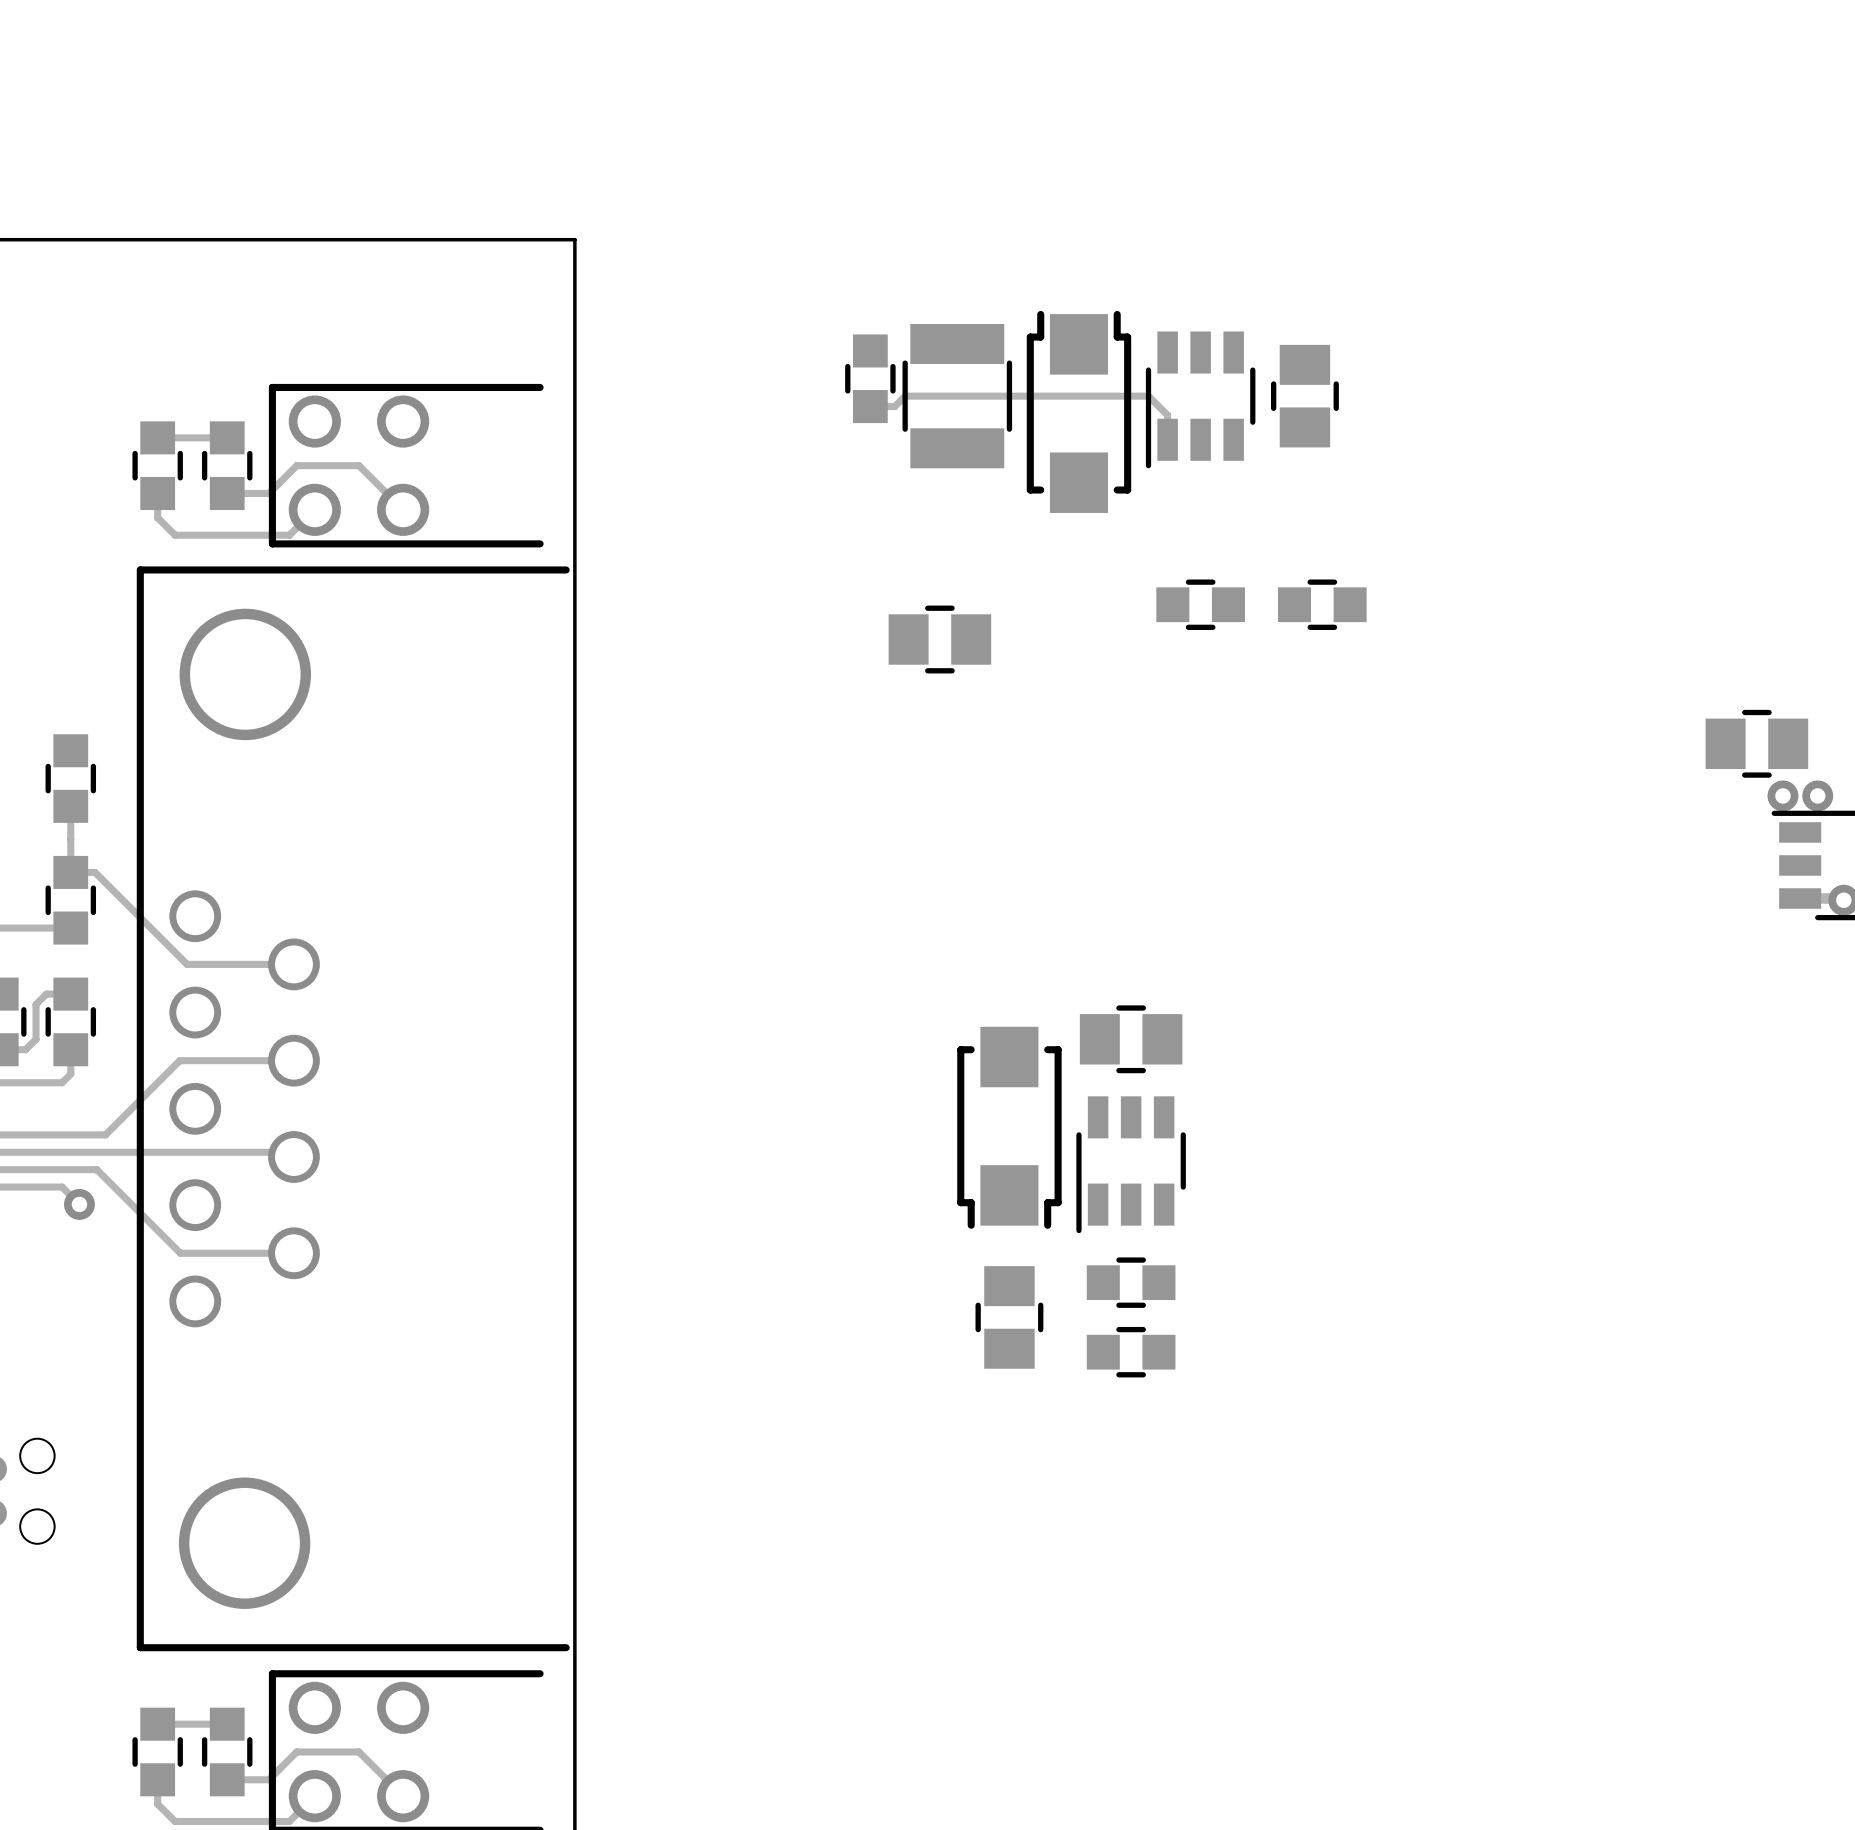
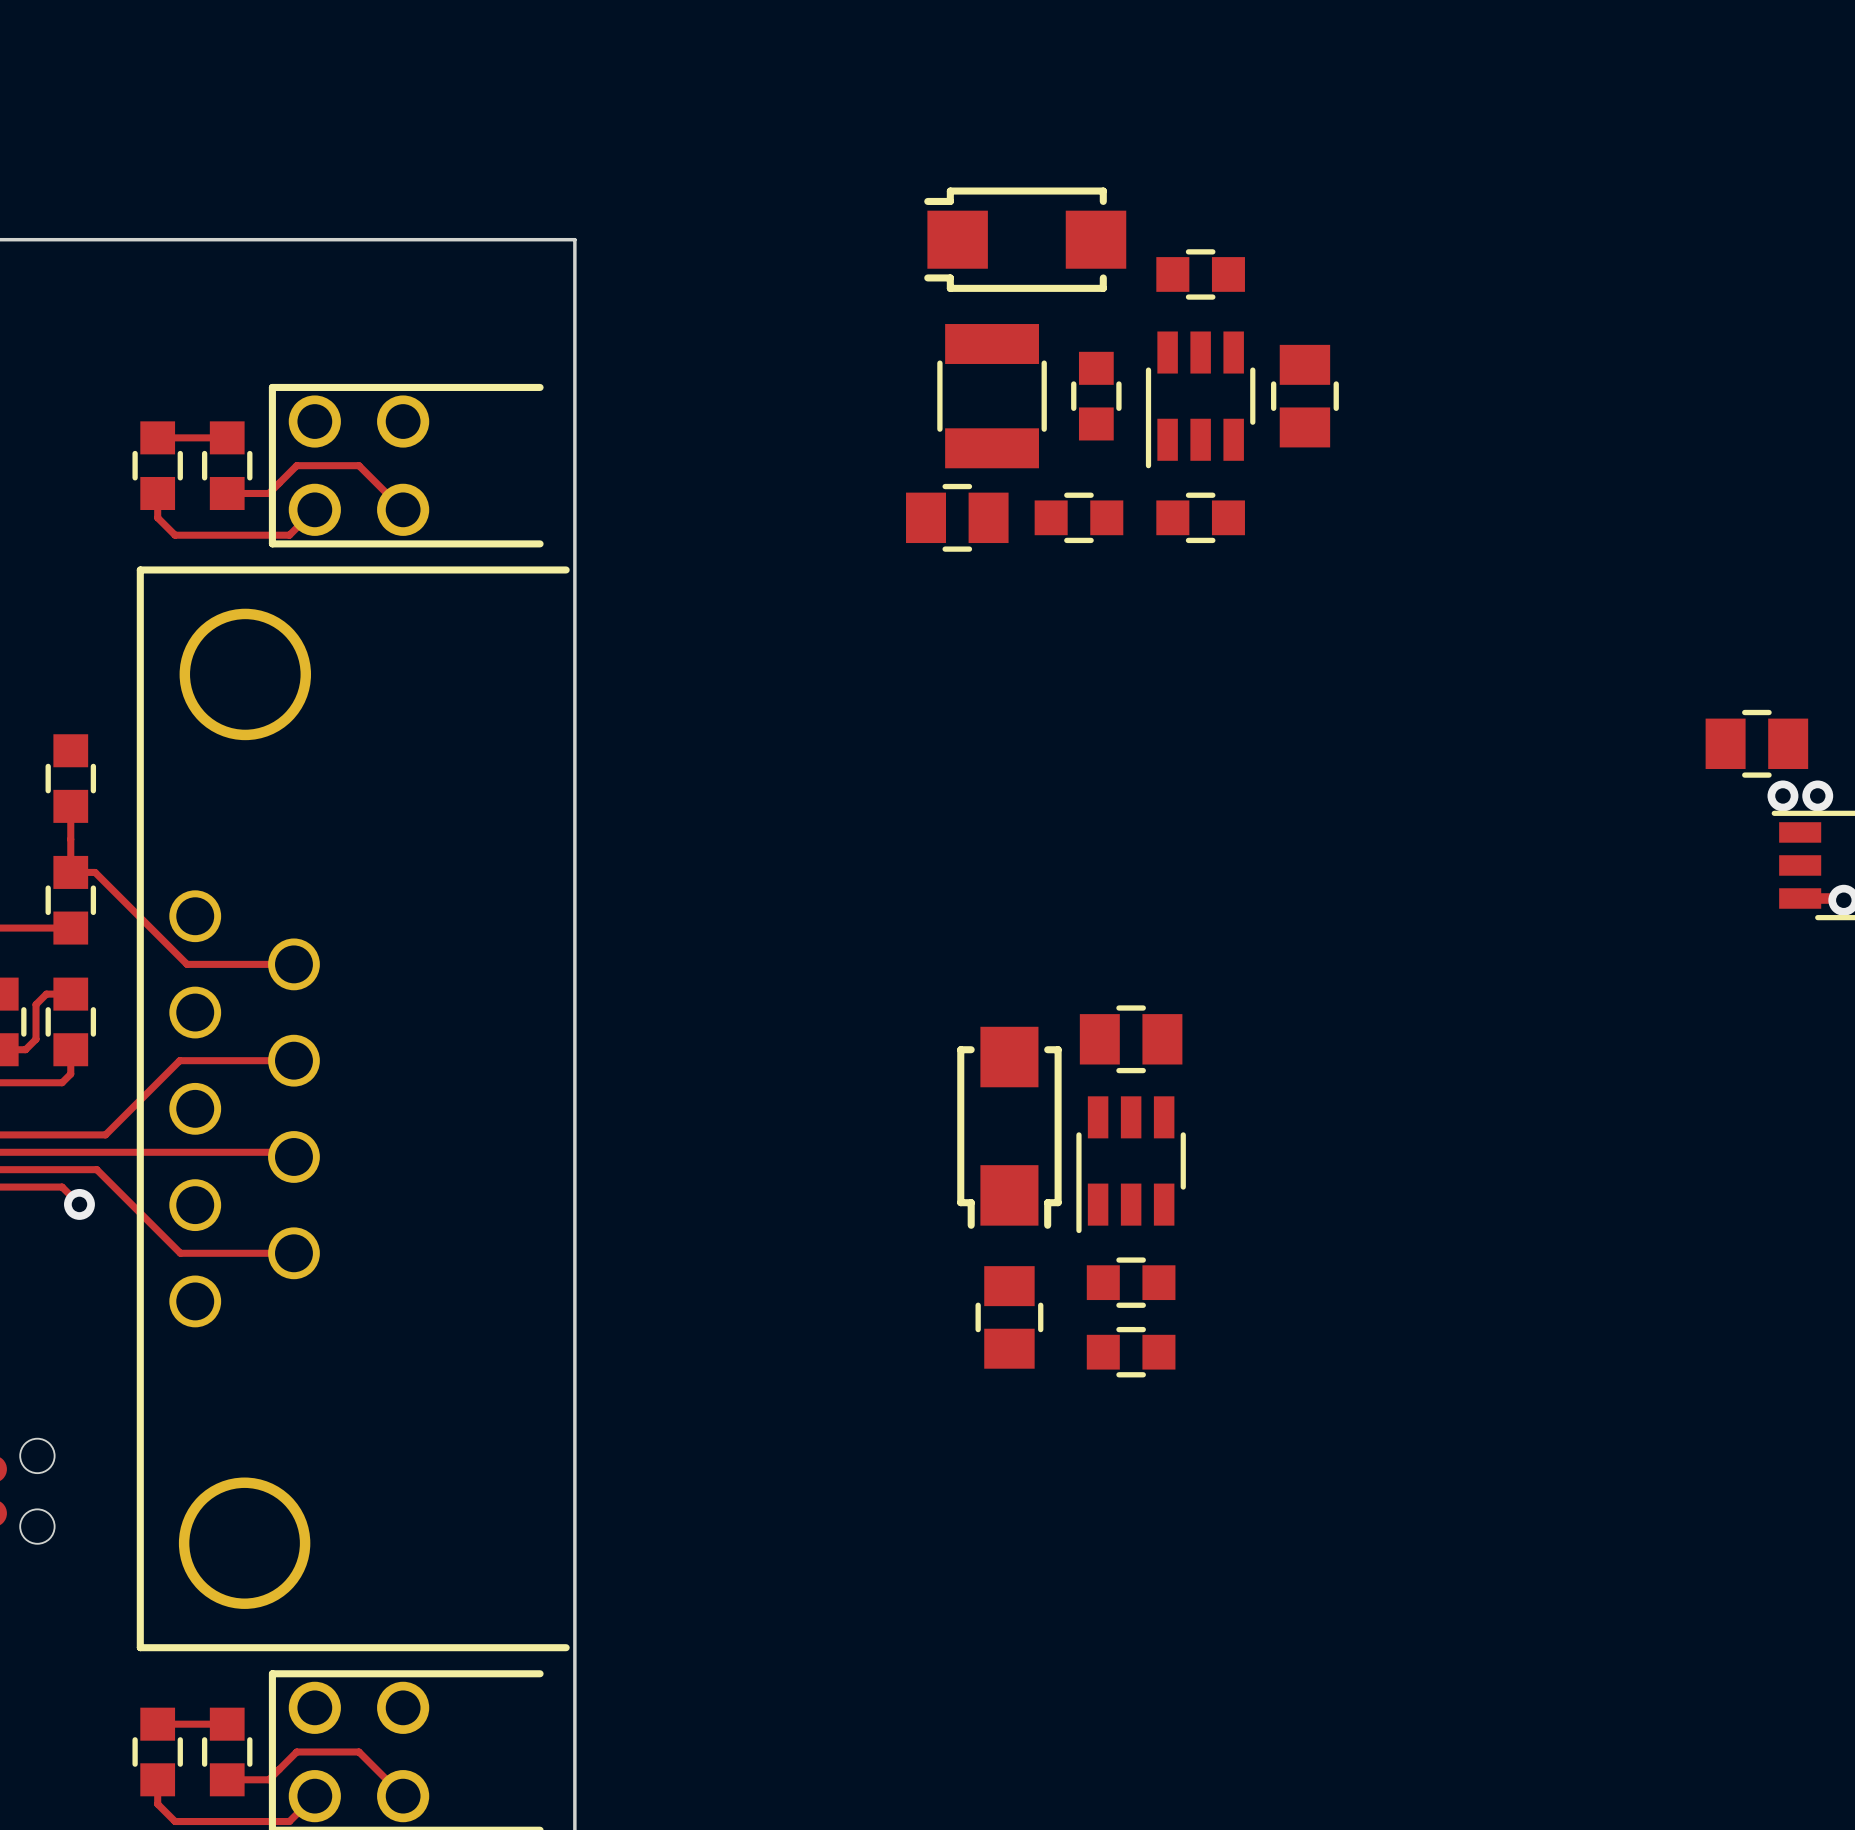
part: none -> (1025, 239)
part: none -> (1200, 274)
part footprint: [1026, 310, 1132, 513] -> [1071, 351, 1122, 441]
part: (870, 378) -> none
part position: (957, 396) -> (992, 396)
track: (870, 406) (894, 406) (905, 396) (1148, 396) (1167, 415) (1167, 439) -> none
part: none -> (1078, 517)
part: none -> (1200, 517)
part: (1200, 604) -> none
part: (1322, 604) -> none
part position: (939, 639) -> (957, 517)

